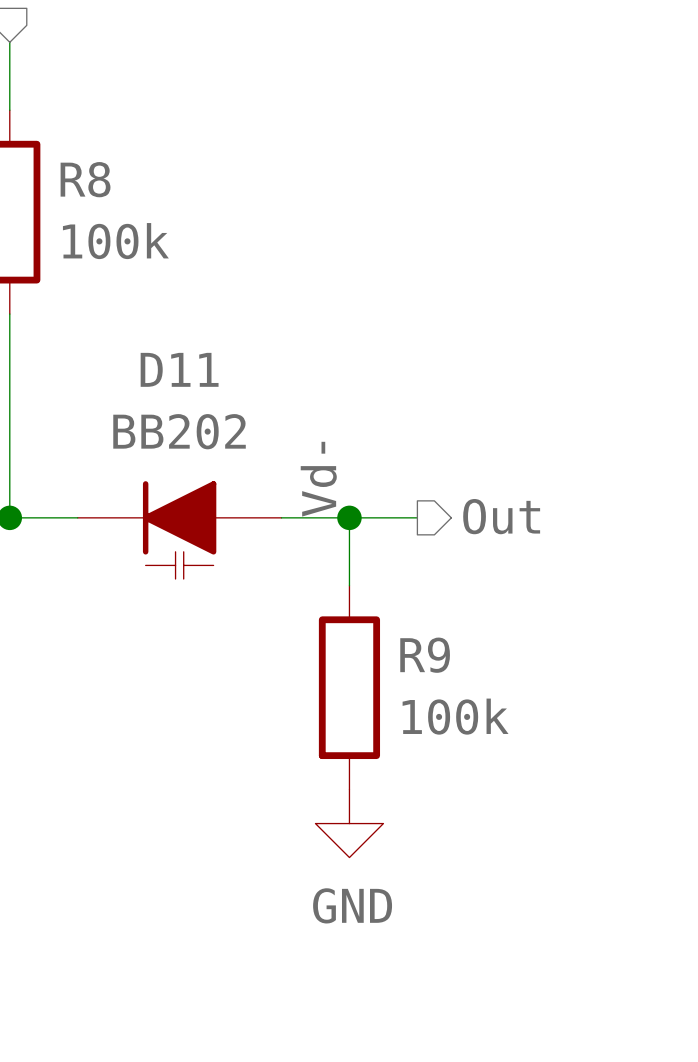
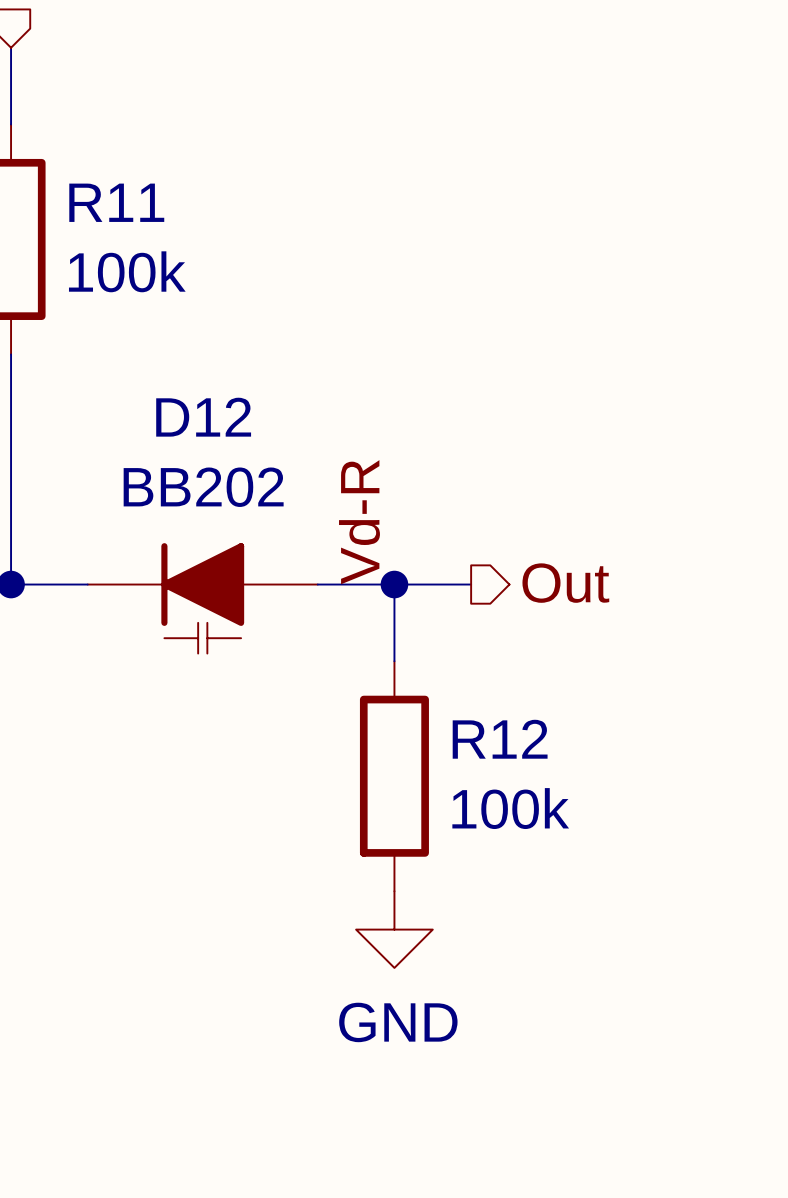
R8 name: R8 (85, 179) -> R11 (116, 202)
D11 name: D11 (179, 369) -> D12 (203, 417)
label: Vd- (318, 479) -> Vd-R (359, 522)
R9 name: R9 (425, 655) -> R12 (500, 739)

